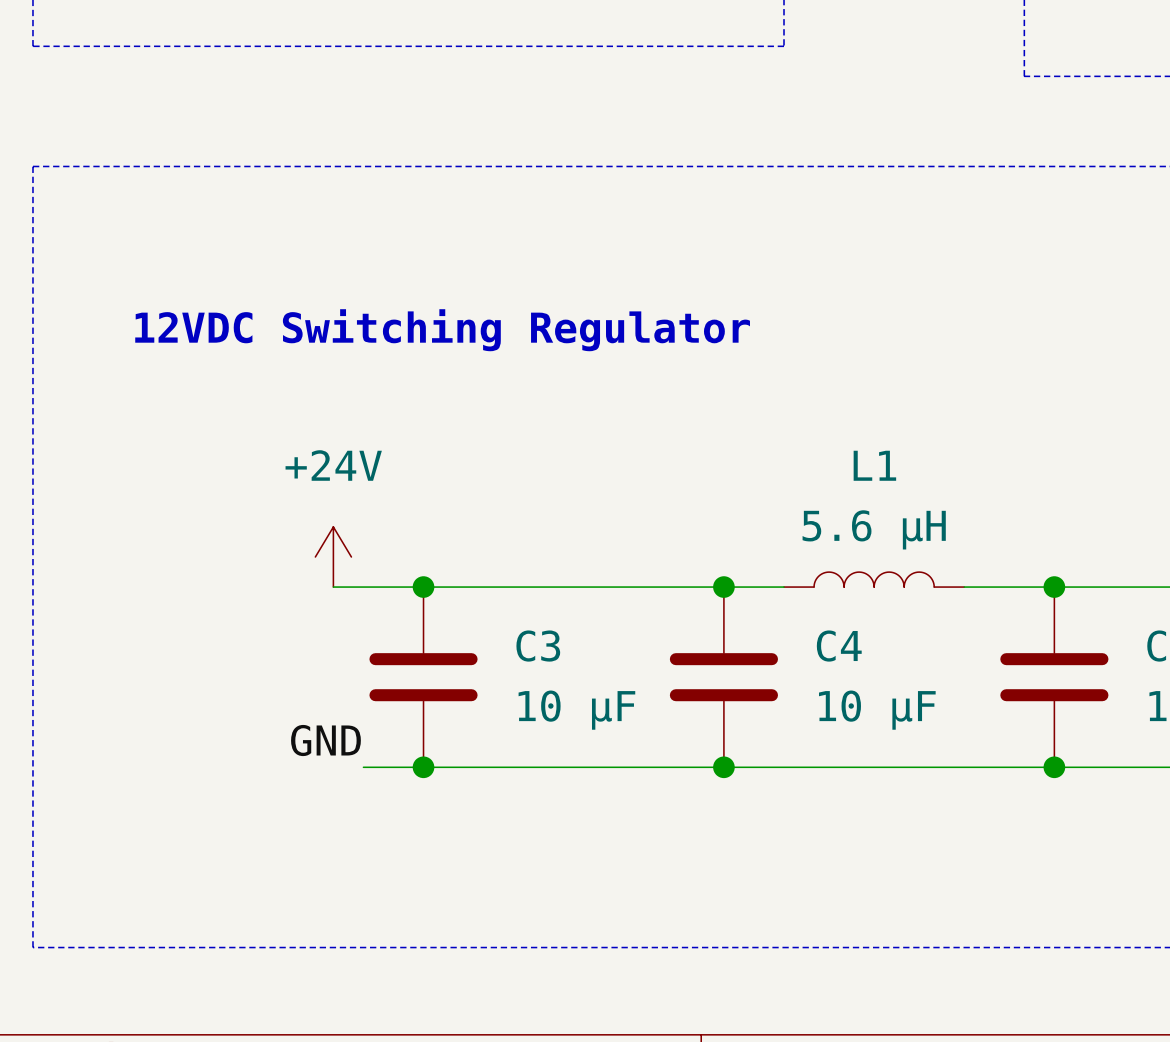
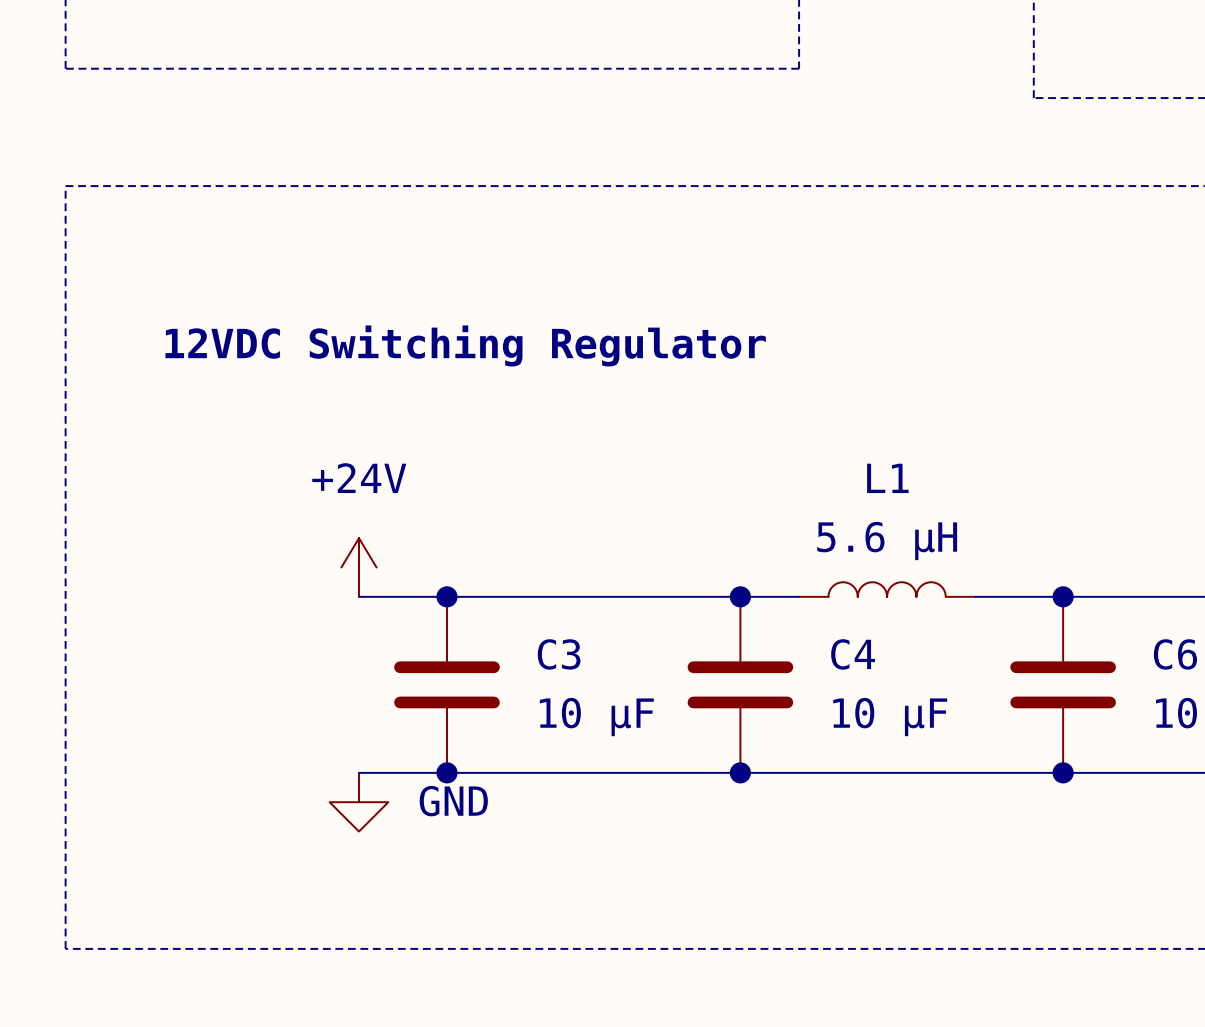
label: GND (325, 740) -> none
wire: none -> (359, 772) (388, 772)
power symbol: none -> GND (359, 802)

